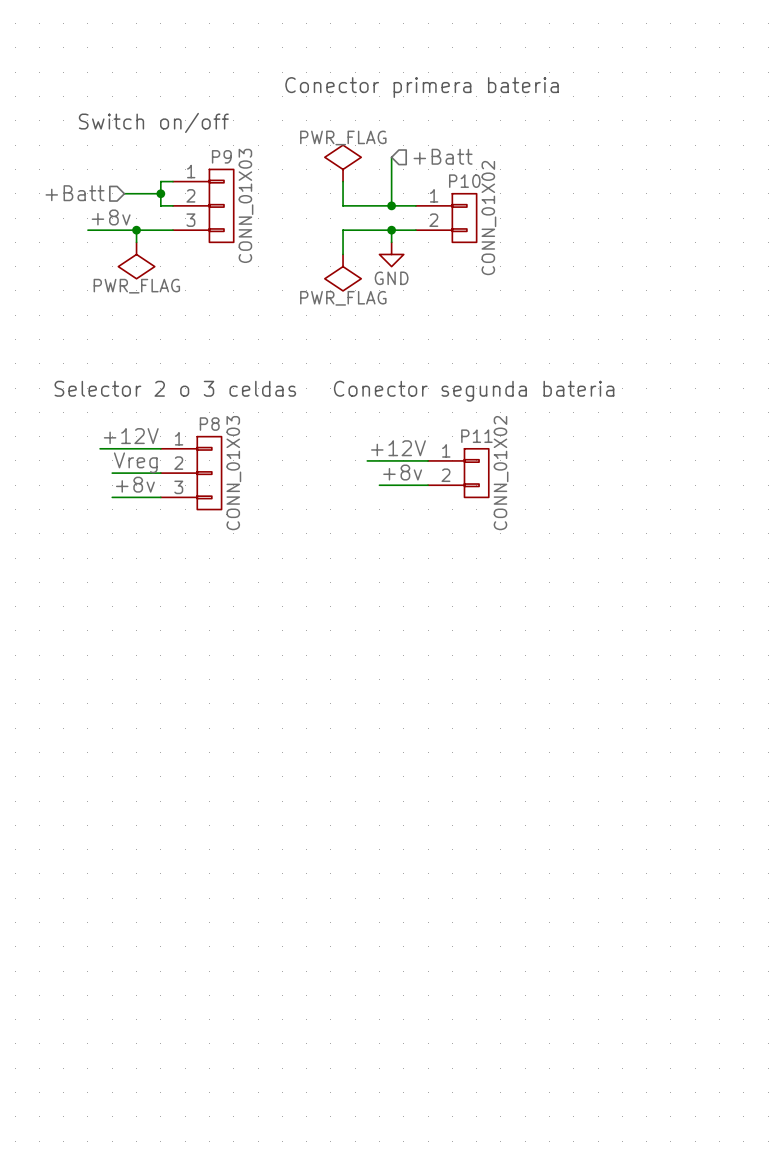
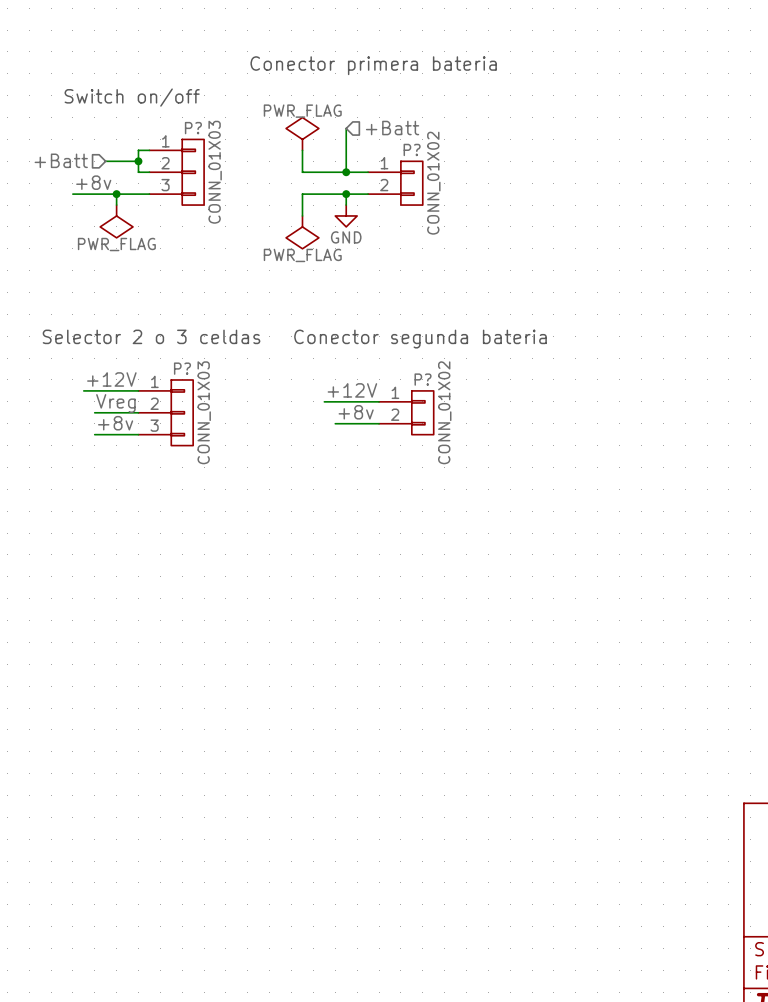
P9 name: P9 (221, 156) -> P? (193, 128)
P10 name: P10 (464, 181) -> P? (412, 149)
P8 name: P8 (209, 424) -> P? (182, 368)
P11 name: P11 (476, 436) -> P? (423, 379)

